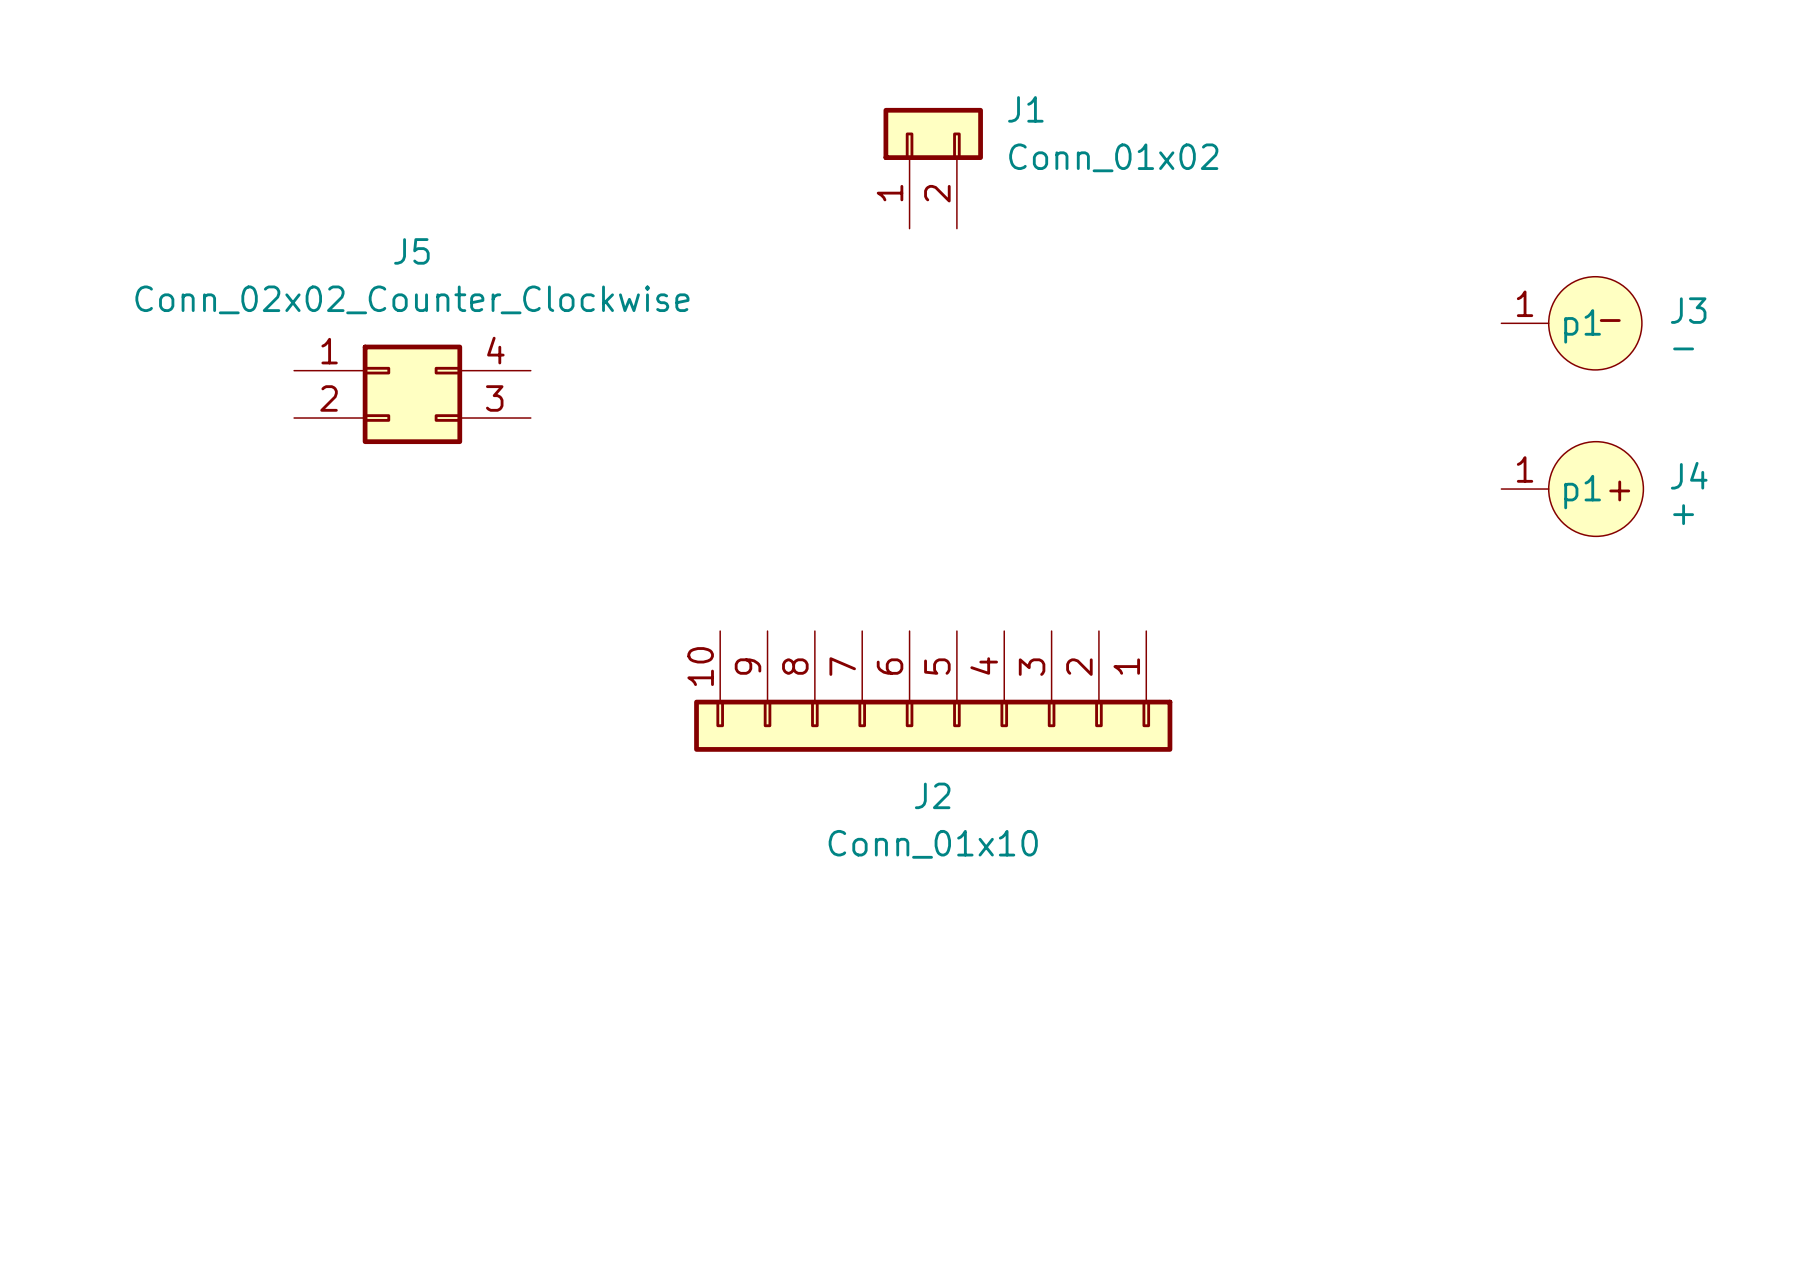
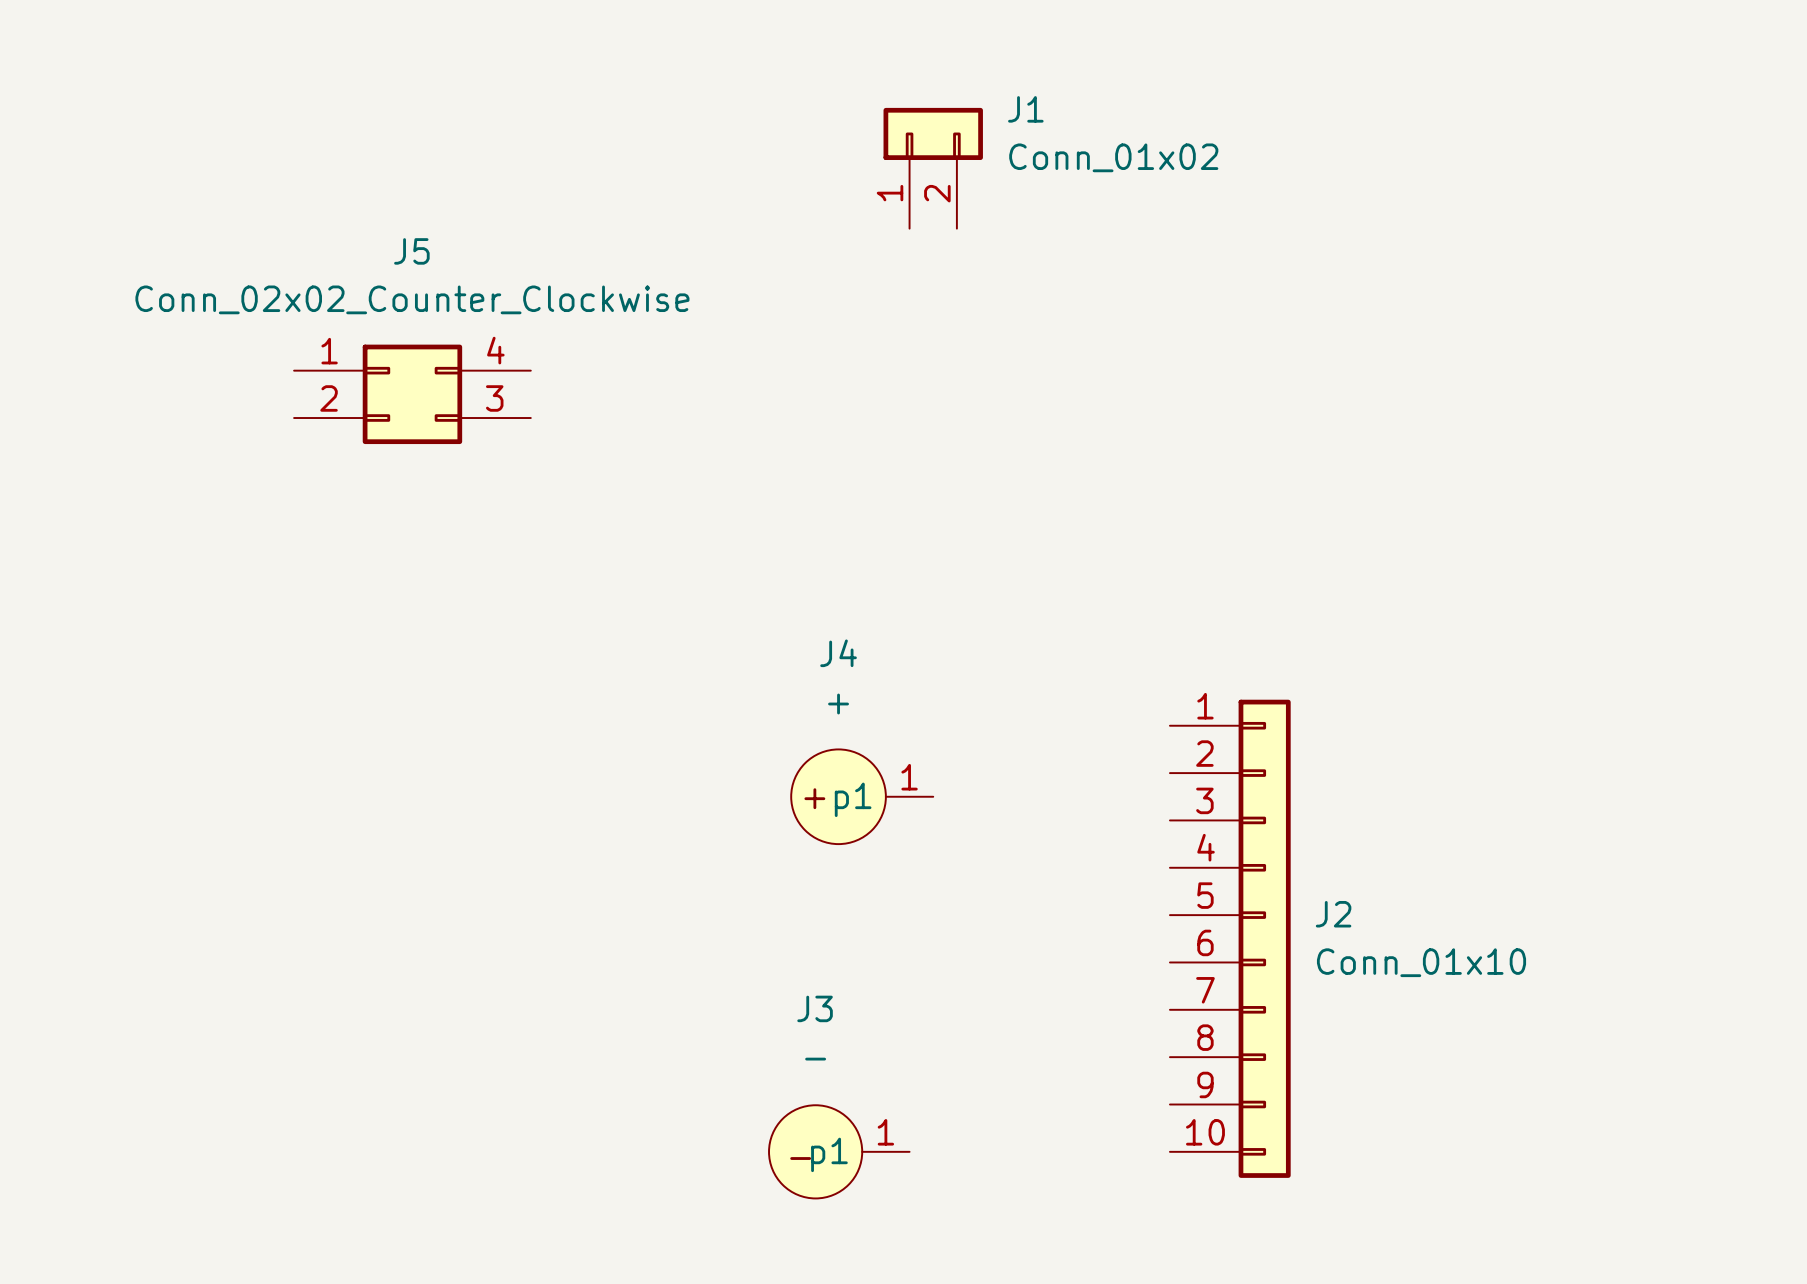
J3 name position: J3 (1688, 310) -> J3 (815, 1008)
J3 position: (1571, 323) -> (839, 1151)
J3 rotation: 0° (1595, 323) -> 180° (815, 1151)
J3 value position: - (1683, 348) -> - (815, 1059)
J4 name position: J4 (1689, 475) -> J4 (838, 653)
J4 position: (1572, 489) -> (862, 796)
J4 rotation: 0° (1596, 489) -> 180° (838, 796)
J4 value position: + (1683, 514) -> + (838, 704)
J2 position: (933, 691) -> (1230, 938)
J2 rotation: 0° (933, 725) -> 90° counterclockwise (1264, 938)
J2 value position: Conn_01x10 (933, 844) -> Conn_01x10 (1421, 962)

